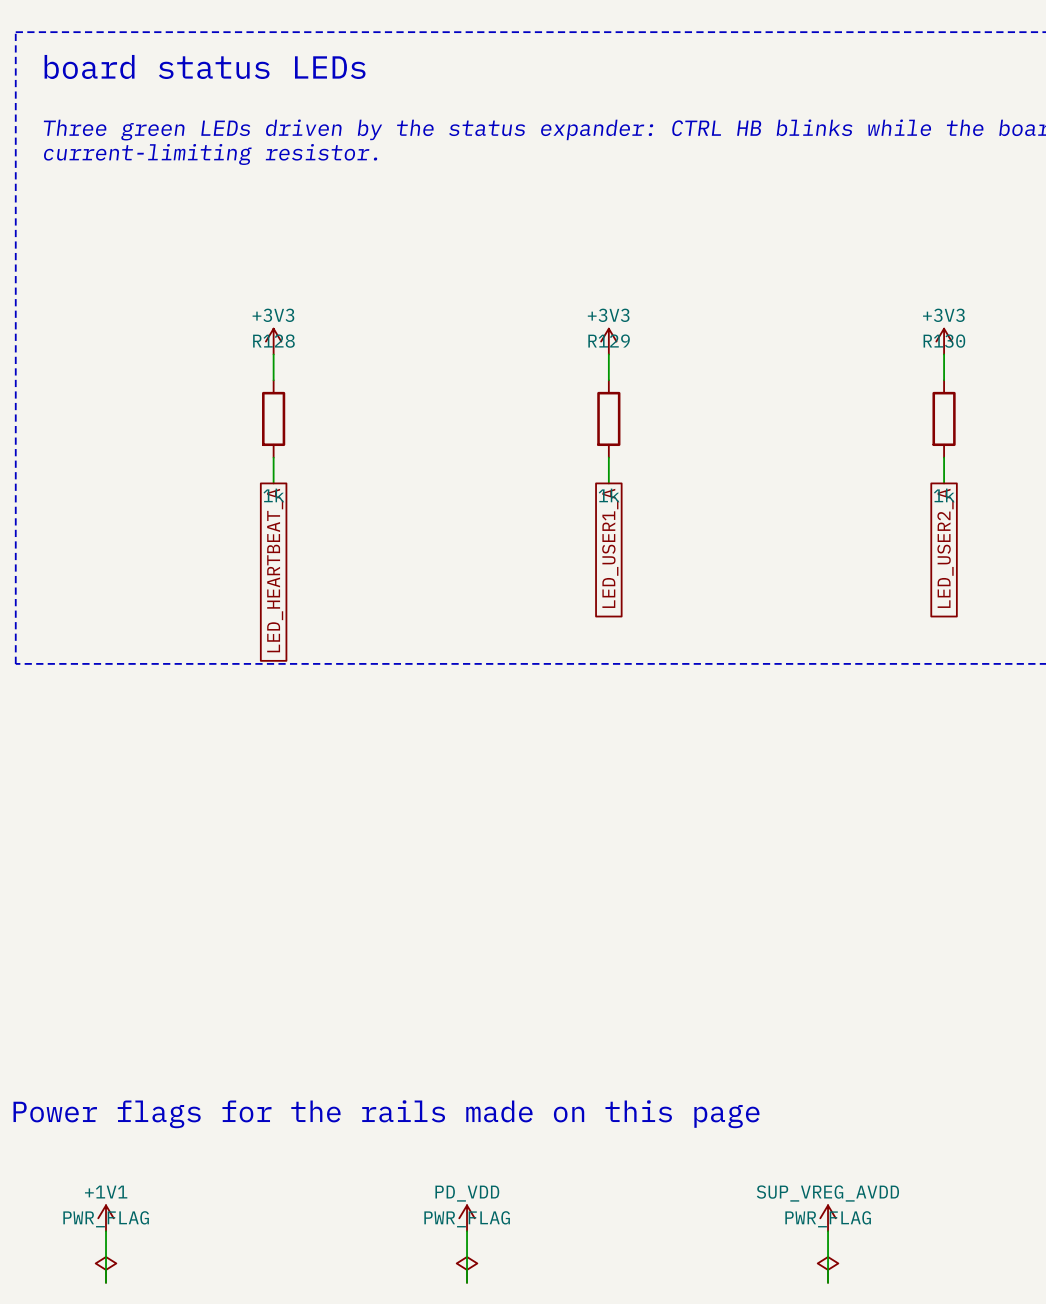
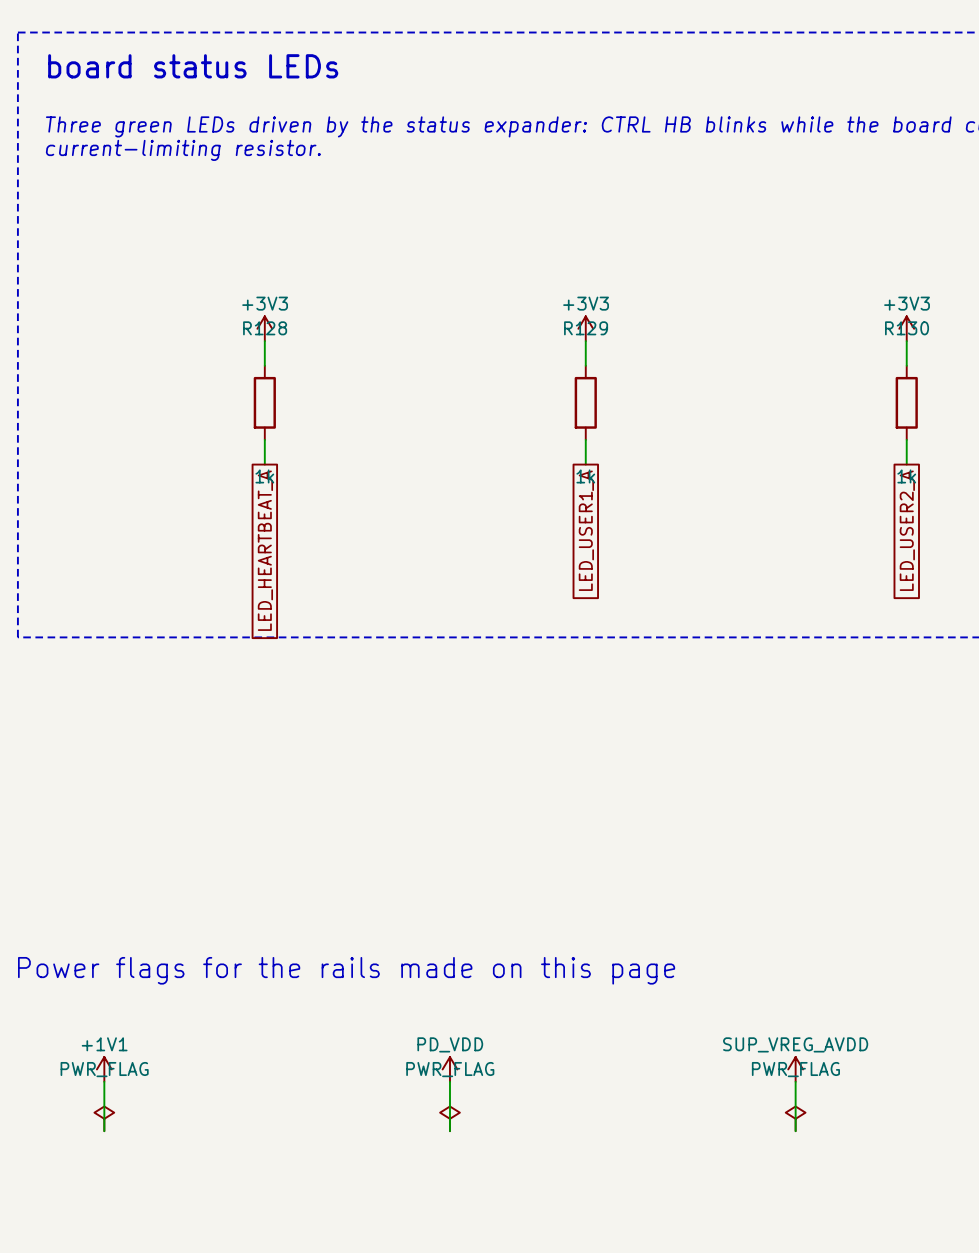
text position: Power flags for the rails made on this page (386, 1114) -> Power flags for the rails made on this page (346, 970)
power symbol position: +1V1 (106, 1218) -> +1V1 (104, 1069)
power symbol position: PD_VDD (467, 1218) -> PD_VDD (449, 1069)
power symbol position: SUP_VREG_AVDD (828, 1218) -> SUP_VREG_AVDD (795, 1069)
wire: (106, 1231) (106, 1282) -> (104, 1081) (104, 1131)
wire: (467, 1231) (467, 1282) -> (449, 1081) (449, 1131)
wire: (828, 1231) (828, 1282) -> (795, 1081) (795, 1131)
power symbol position: PWR_FLAG (106, 1269) -> PWR_FLAG (104, 1118)
power symbol position: PWR_FLAG (467, 1269) -> PWR_FLAG (449, 1118)
power symbol position: PWR_FLAG (828, 1269) -> PWR_FLAG (795, 1118)

